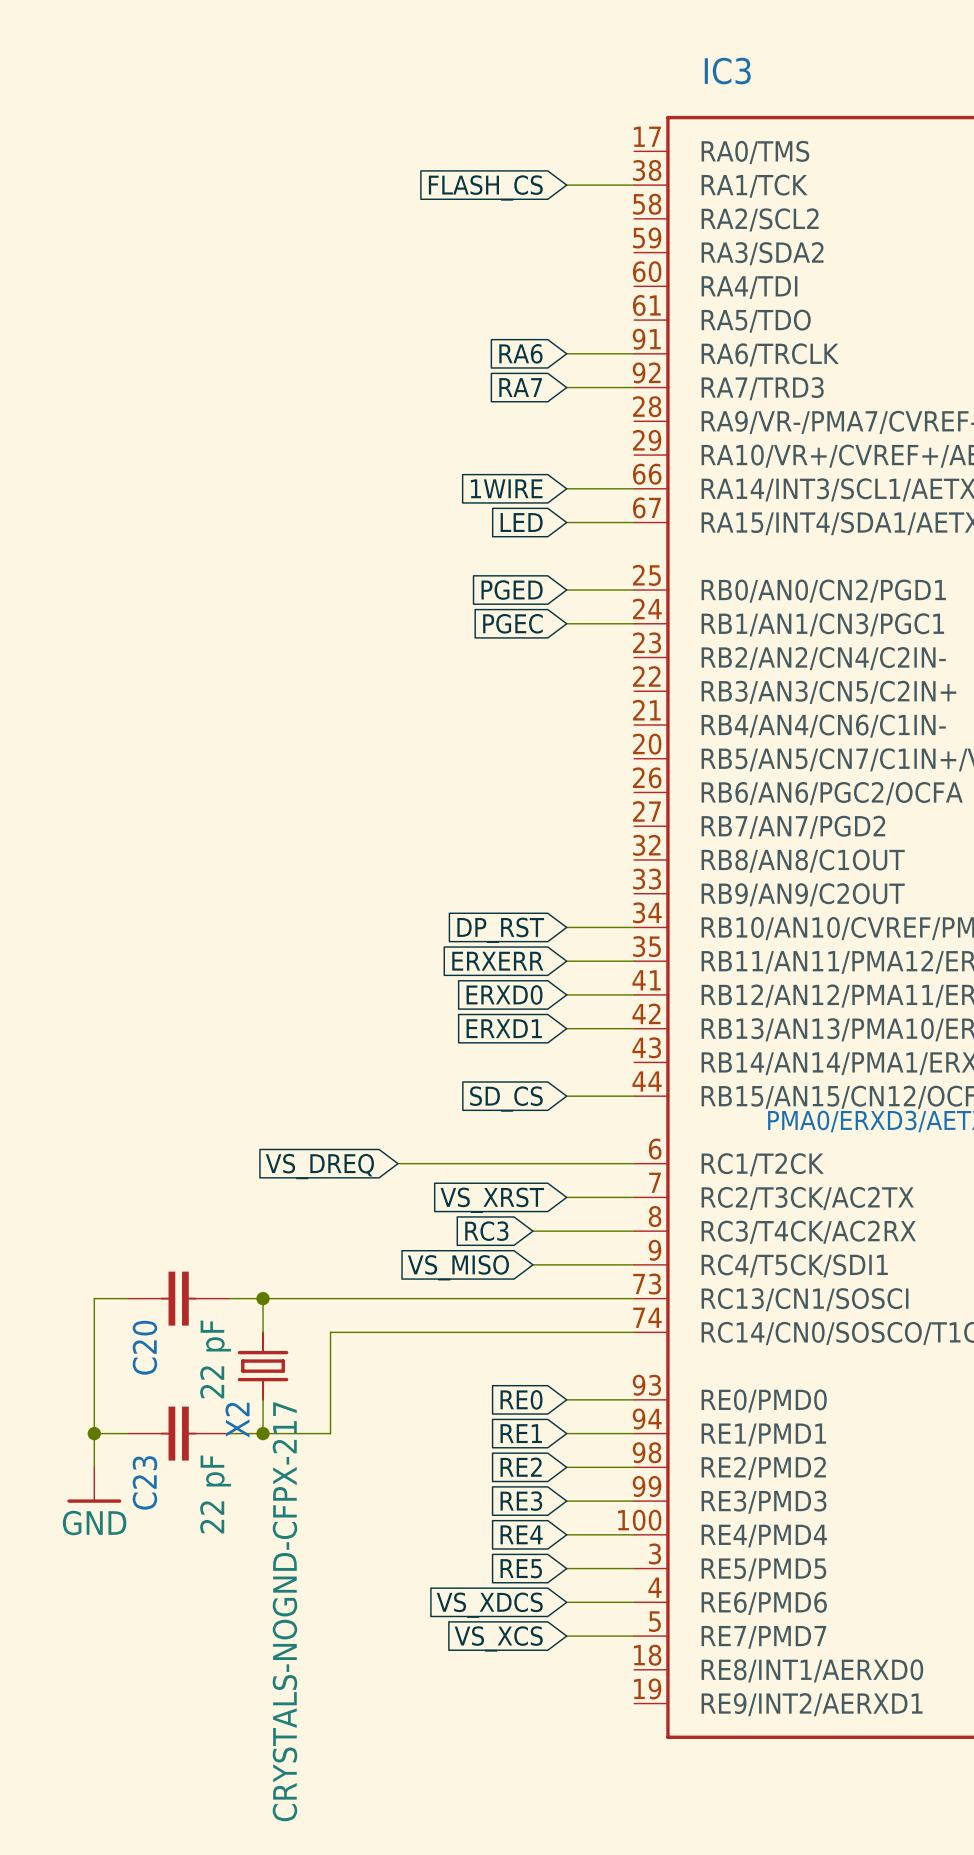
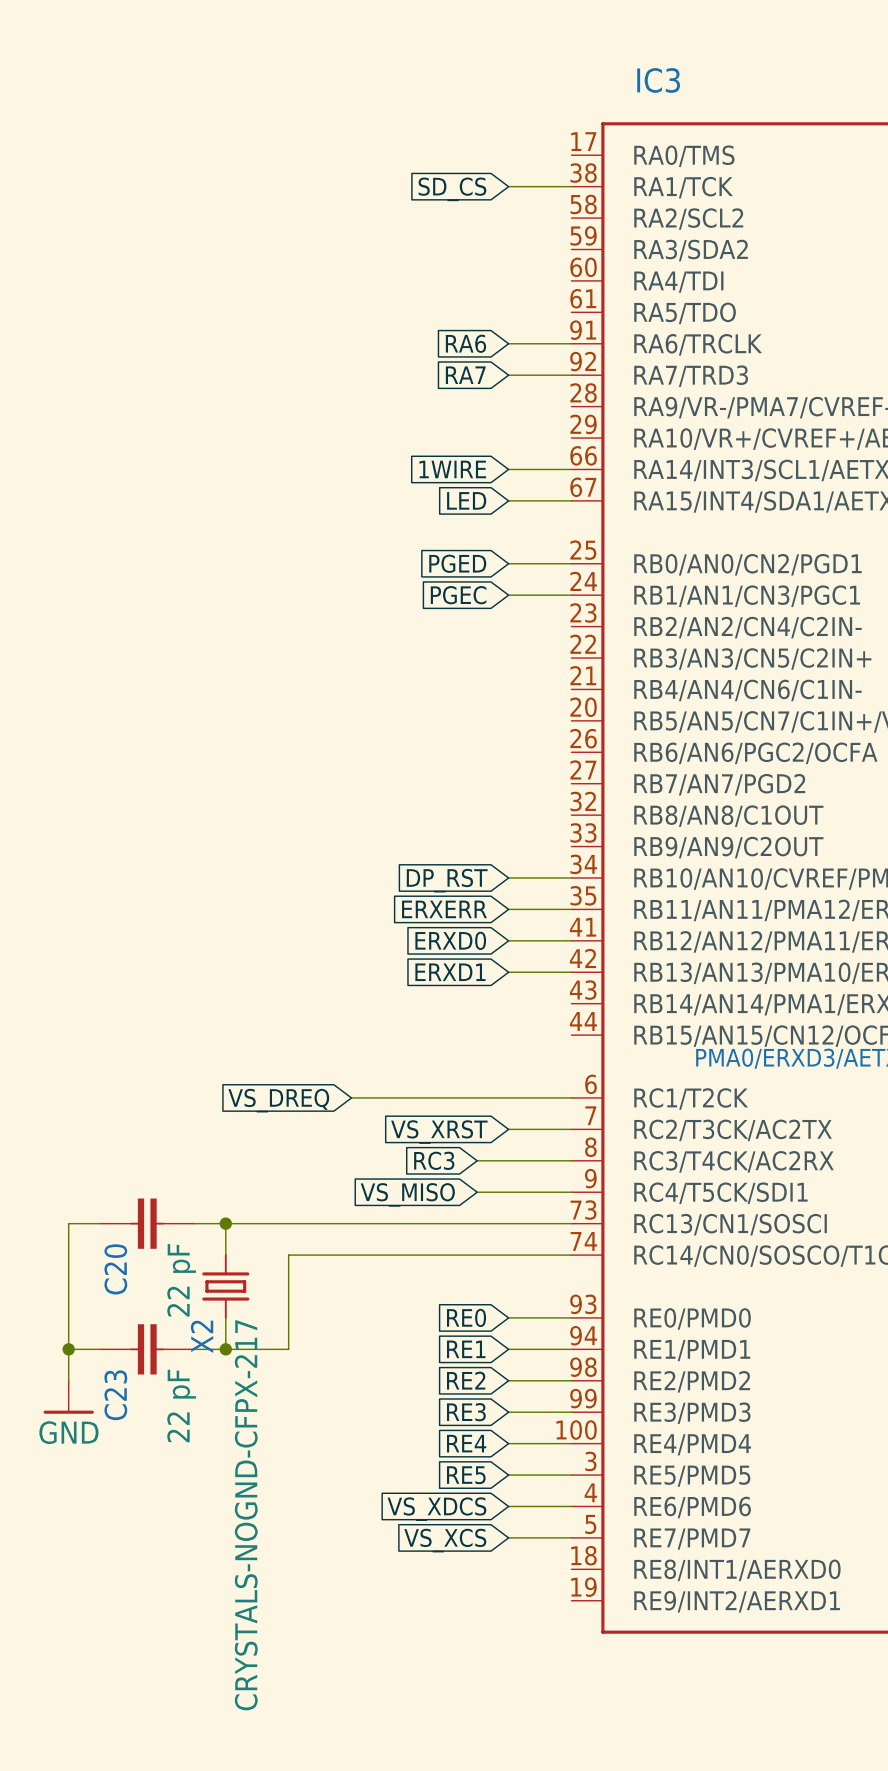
global label: FLASH_CS (485, 187) -> SD_CS (452, 189)
wire: (566, 1096) (634, 1096) -> none
global label: SD_CS (506, 1099) -> none

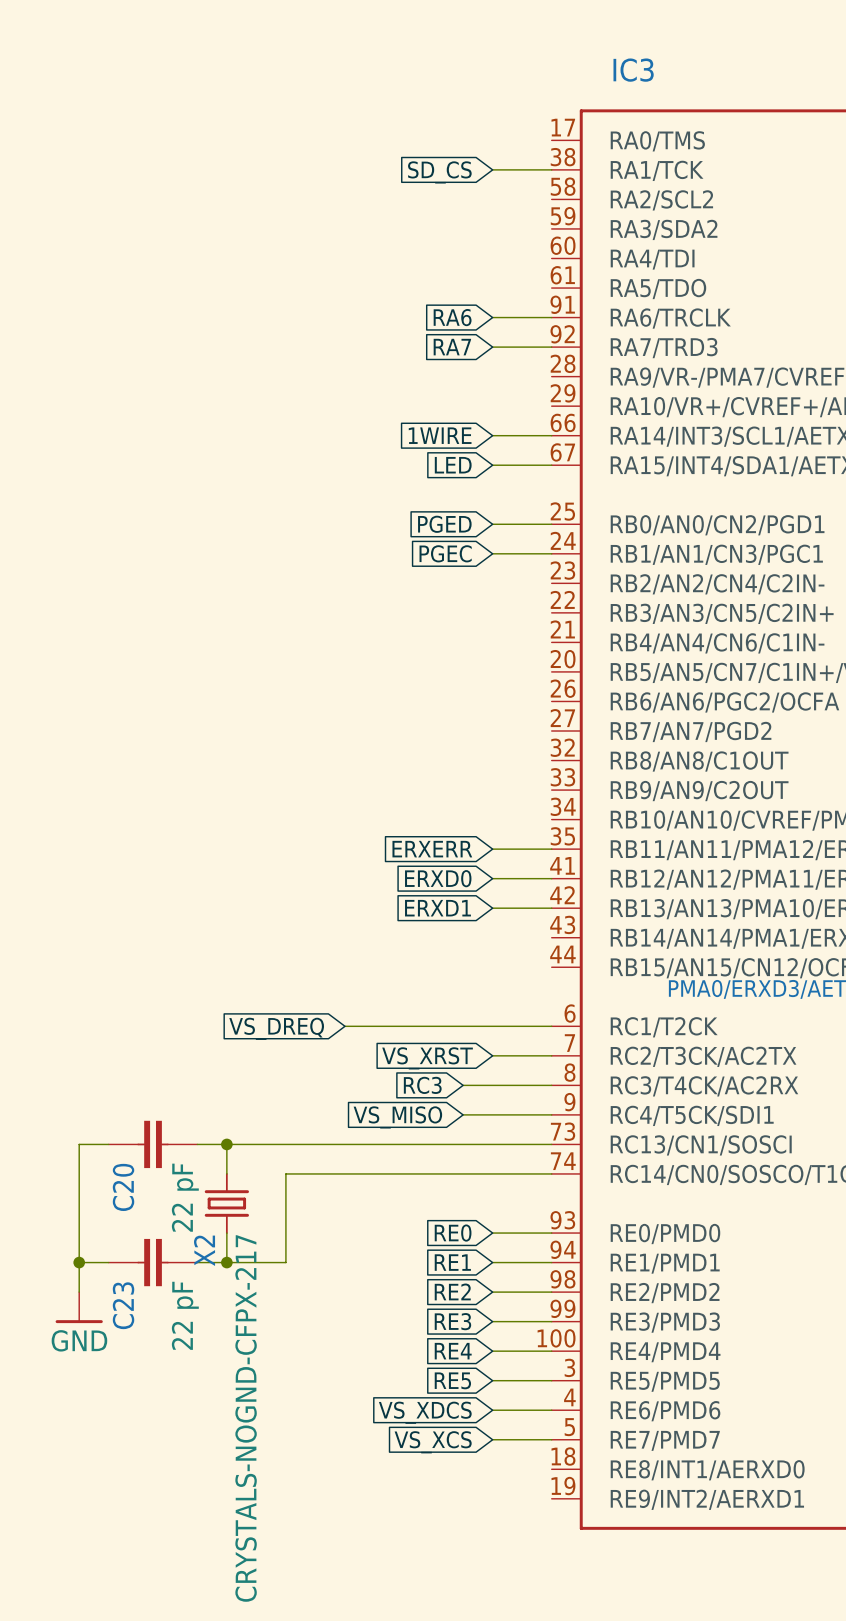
wire: (508, 877) (571, 877) -> none
global label: DP_RST (447, 880) -> none

